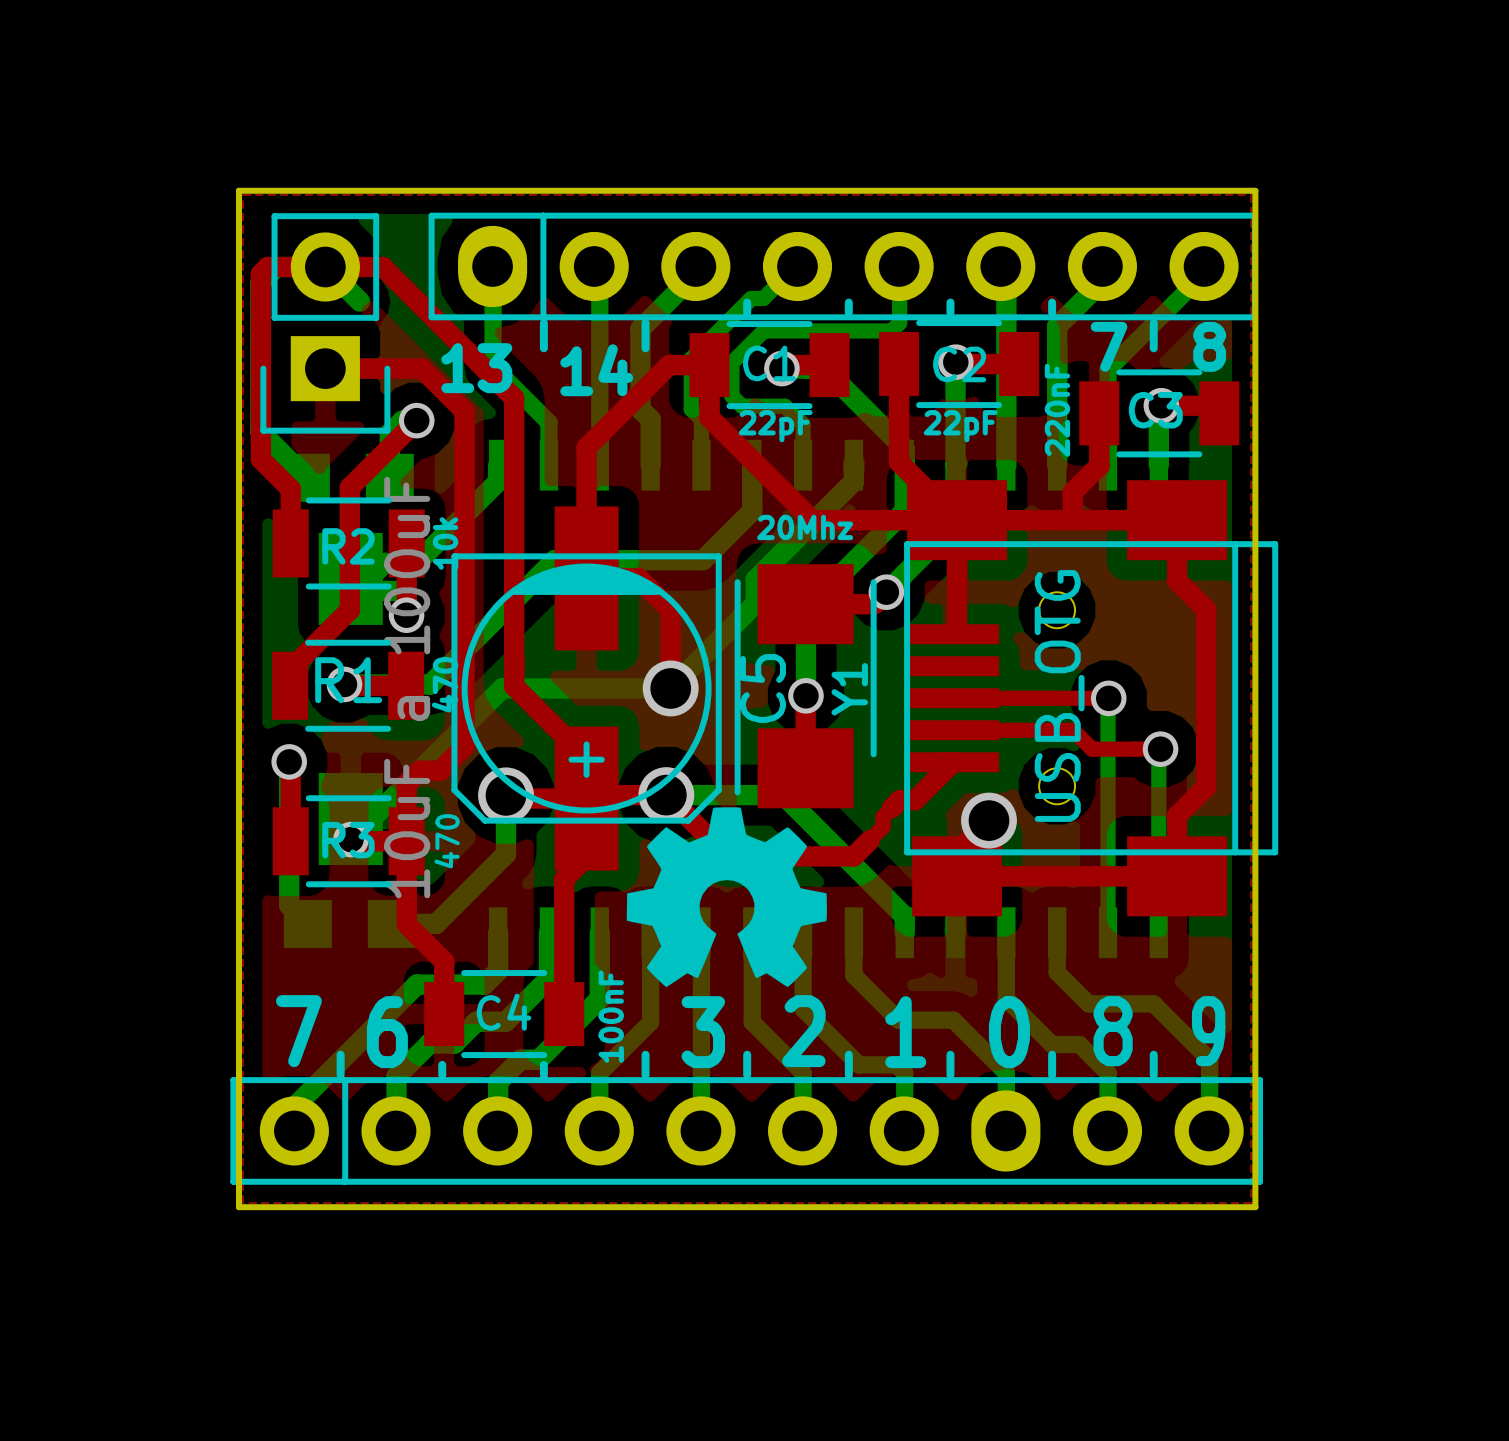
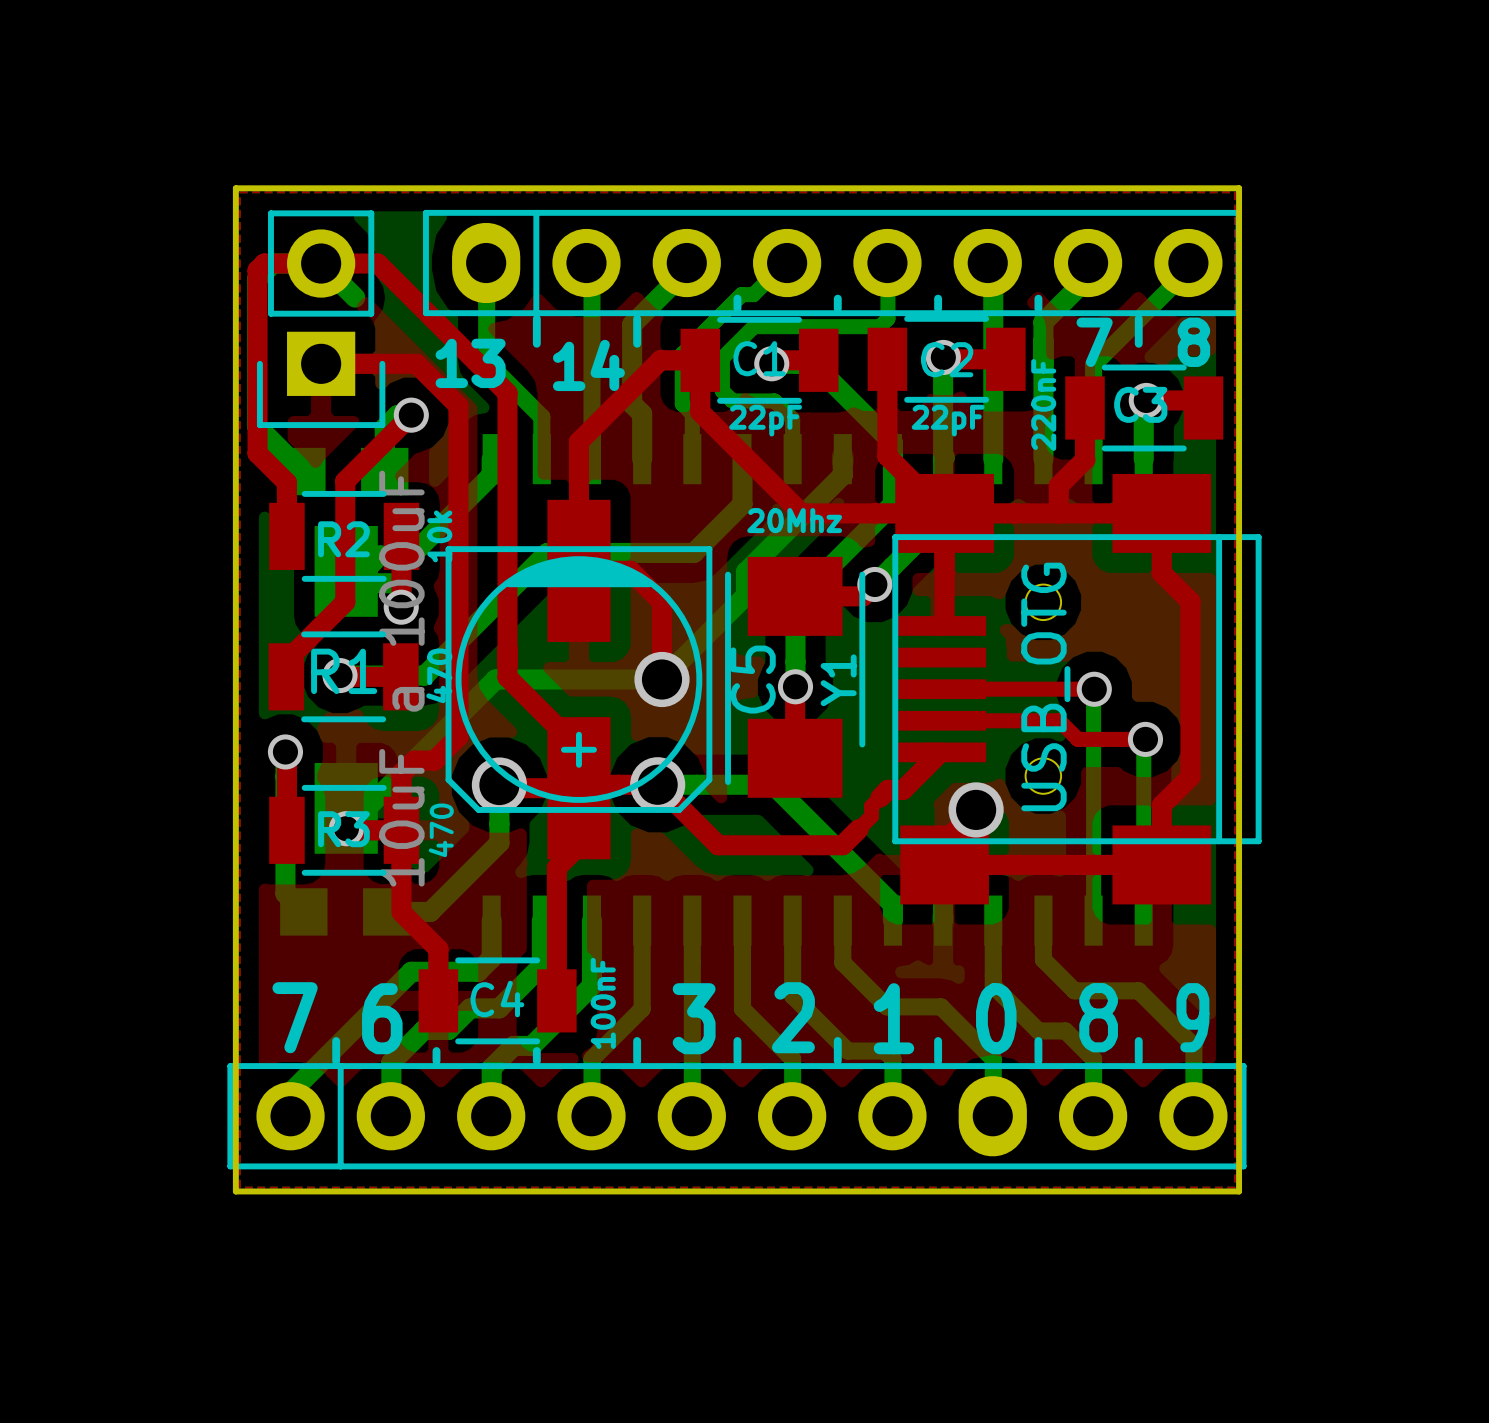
drawing: [626, 807, 827, 988] -> none

